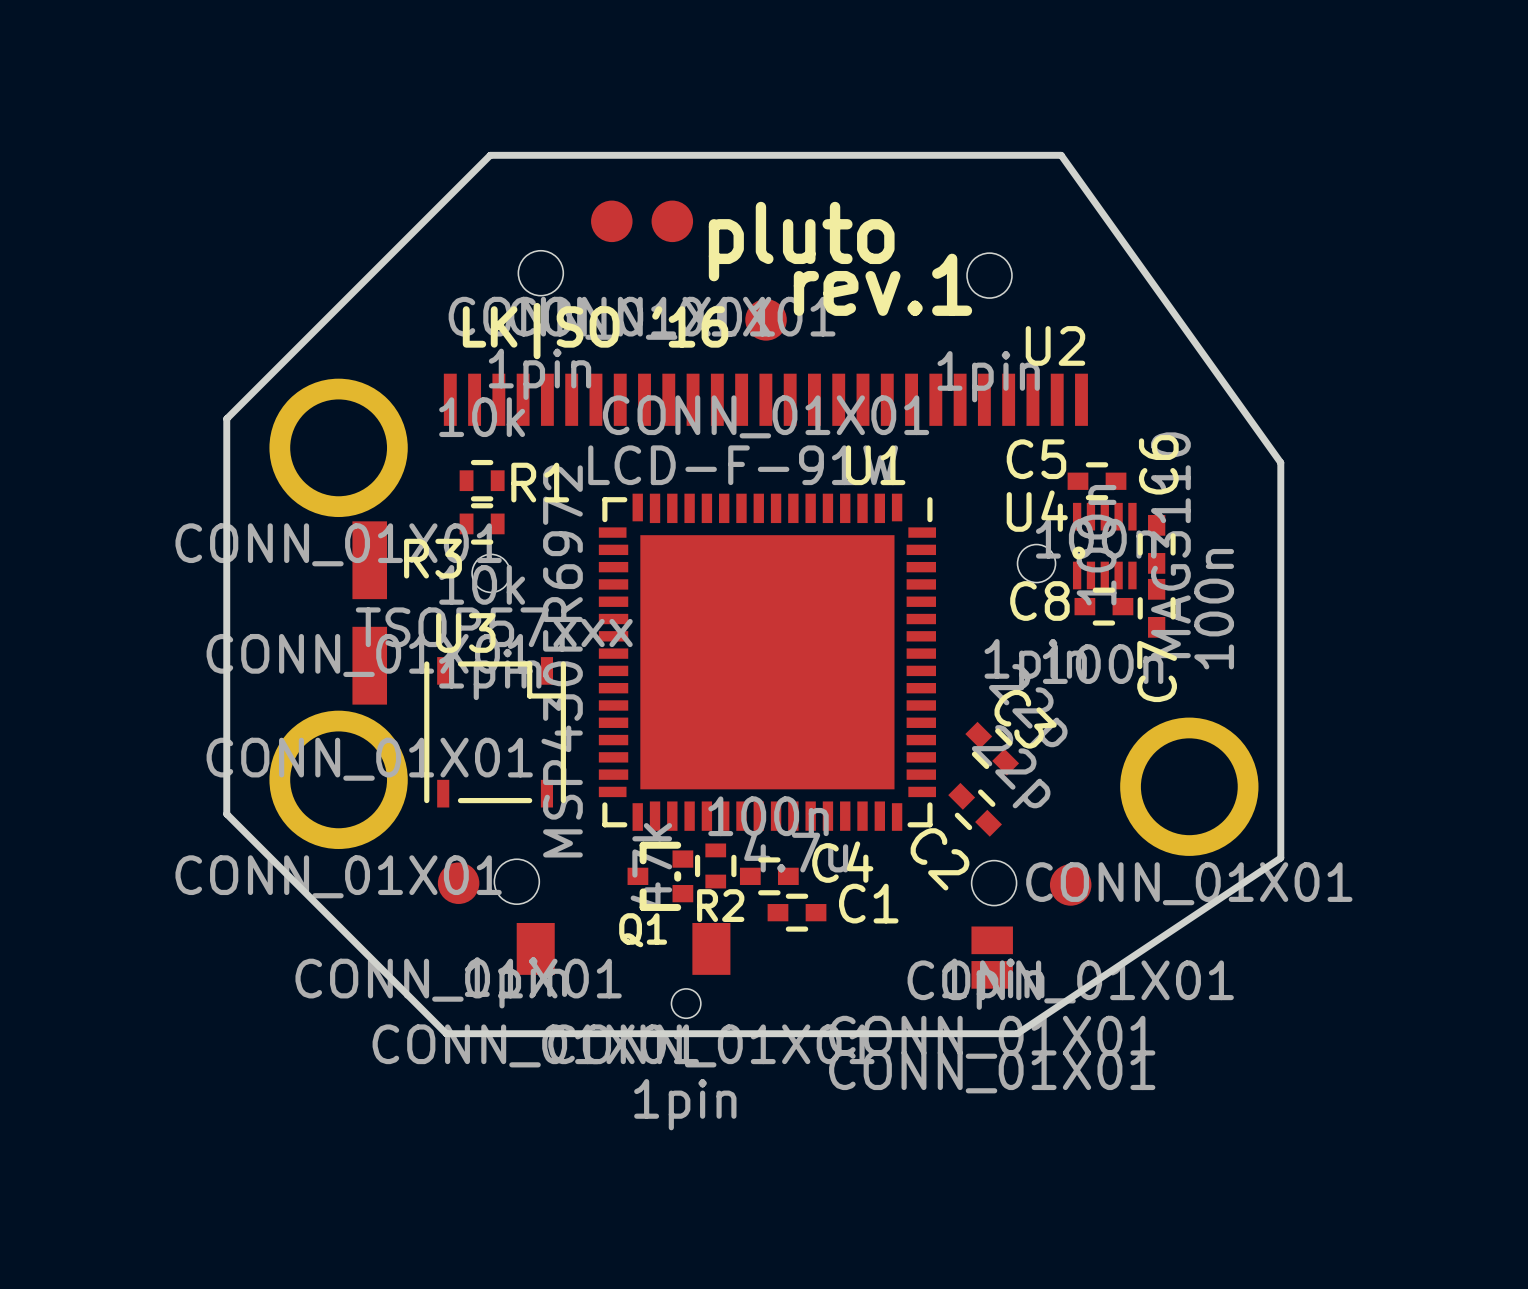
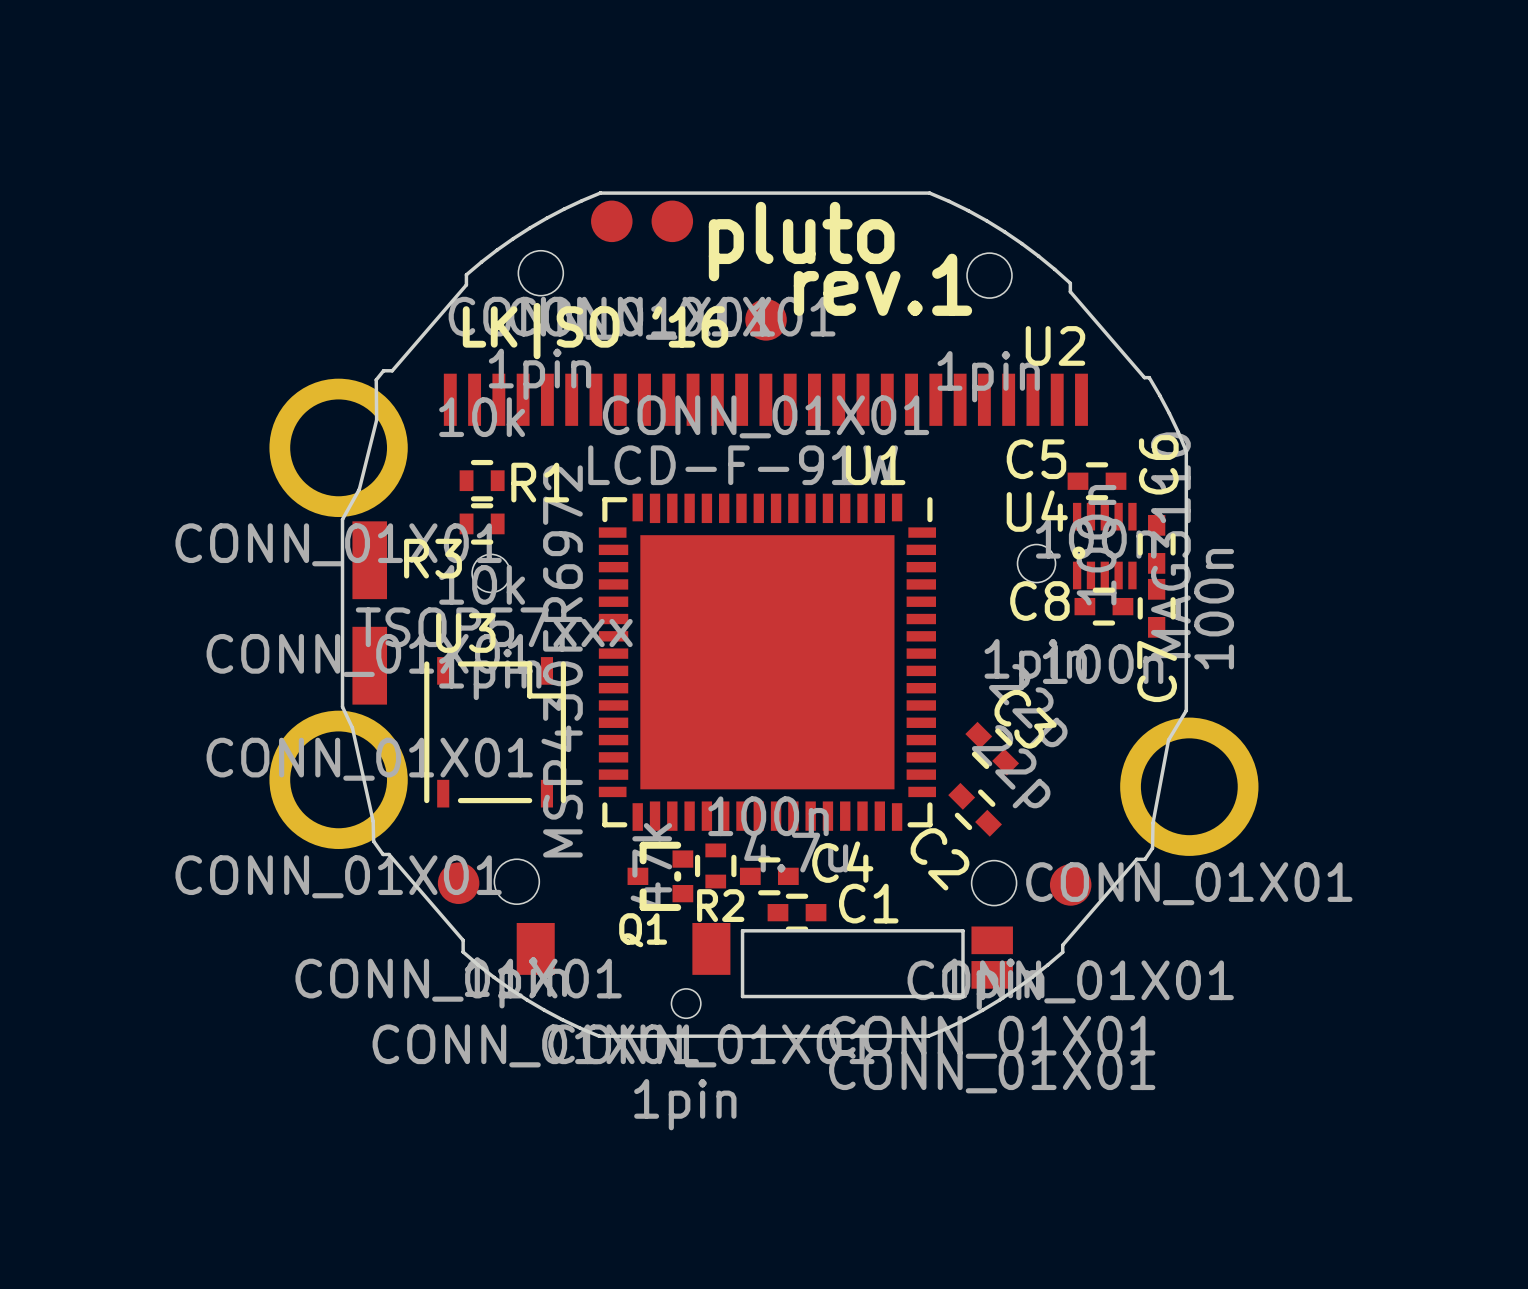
board edge: (490, 155) (226, 418) (226, 814) (446, 1033) (1017, 1033) (1280, 858) (1280, 462) (1061, 155) (490, 155) -> (600, 193) (929, 193) (949, 201) (1004, 231) (1038, 256) (1070, 283) (1070, 291) (1144, 377) (1149, 377) (1169, 413) (1186, 451) (1186, 710) (1168, 740) (1153, 823) (1152, 848) (1145, 859) (1136, 859) (1062, 945) (1062, 952) (1047, 965) (1016, 989) (982, 1010) (928, 1036) (599, 1036) (562, 1019) (527, 999) (494, 977) (463, 952) (463, 940) (389, 854) (383, 854) (373, 841) (373, 821) (352, 727) (342, 706) (342, 519) (359, 489) (376, 420) (376, 379) (383, 370) (392, 370) (466, 284) (466, 274) (481, 262) (513, 238) (546, 218) (582, 200) (600, 193)
board edge: none -> (742, 930) (962, 930) (962, 996) (742, 996) (742, 930)

